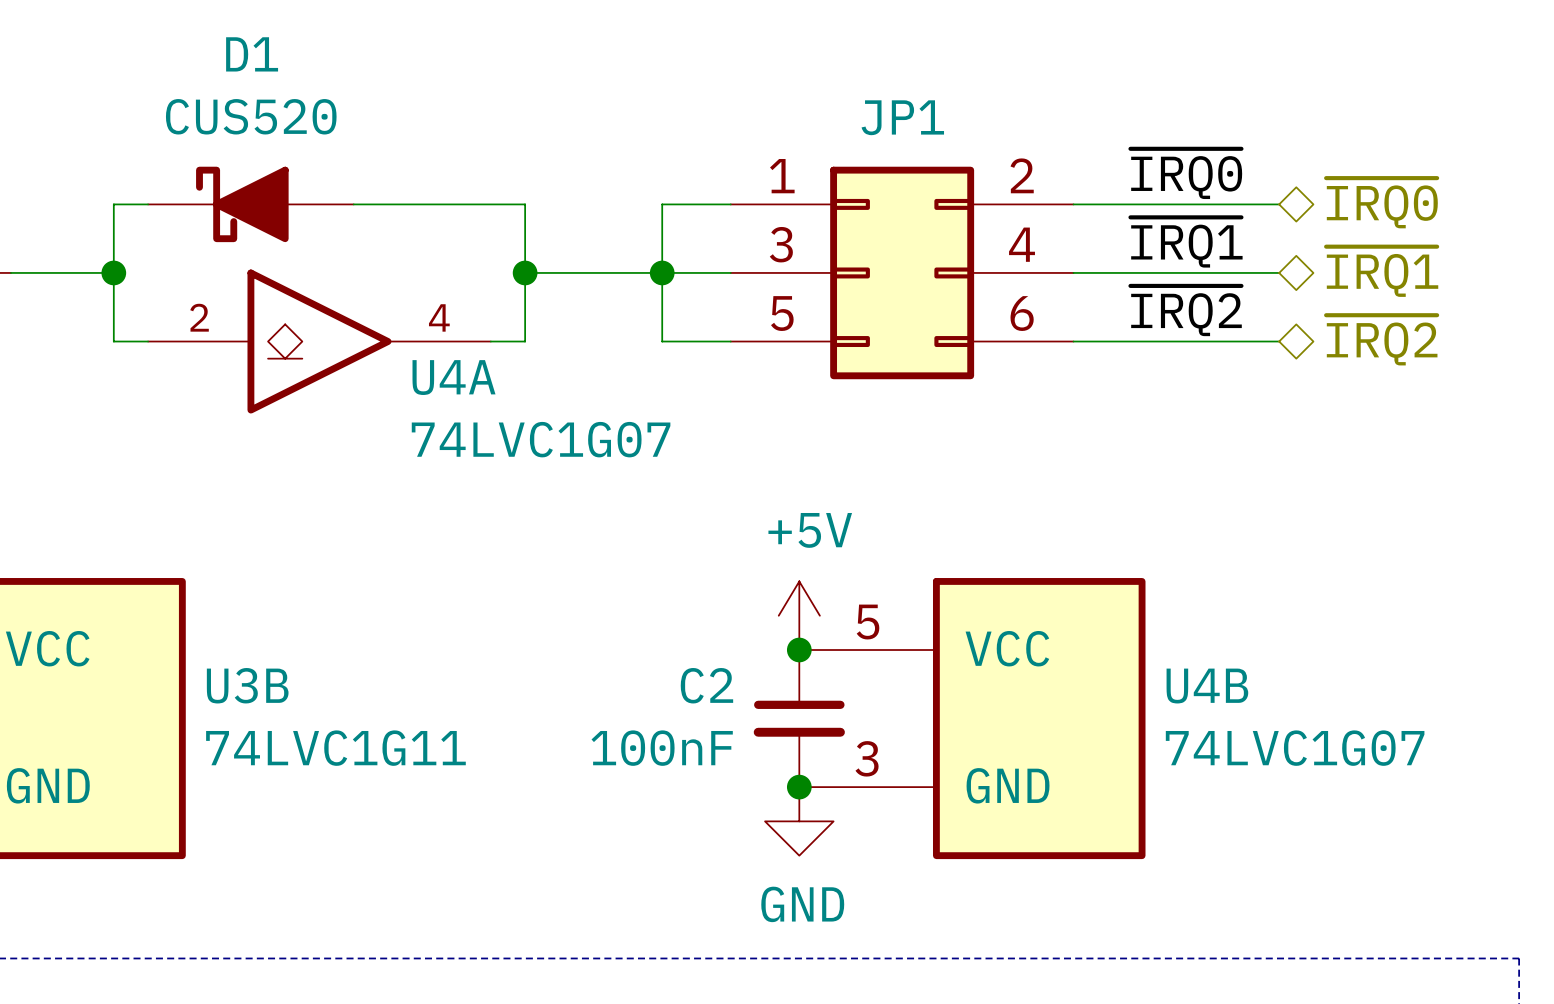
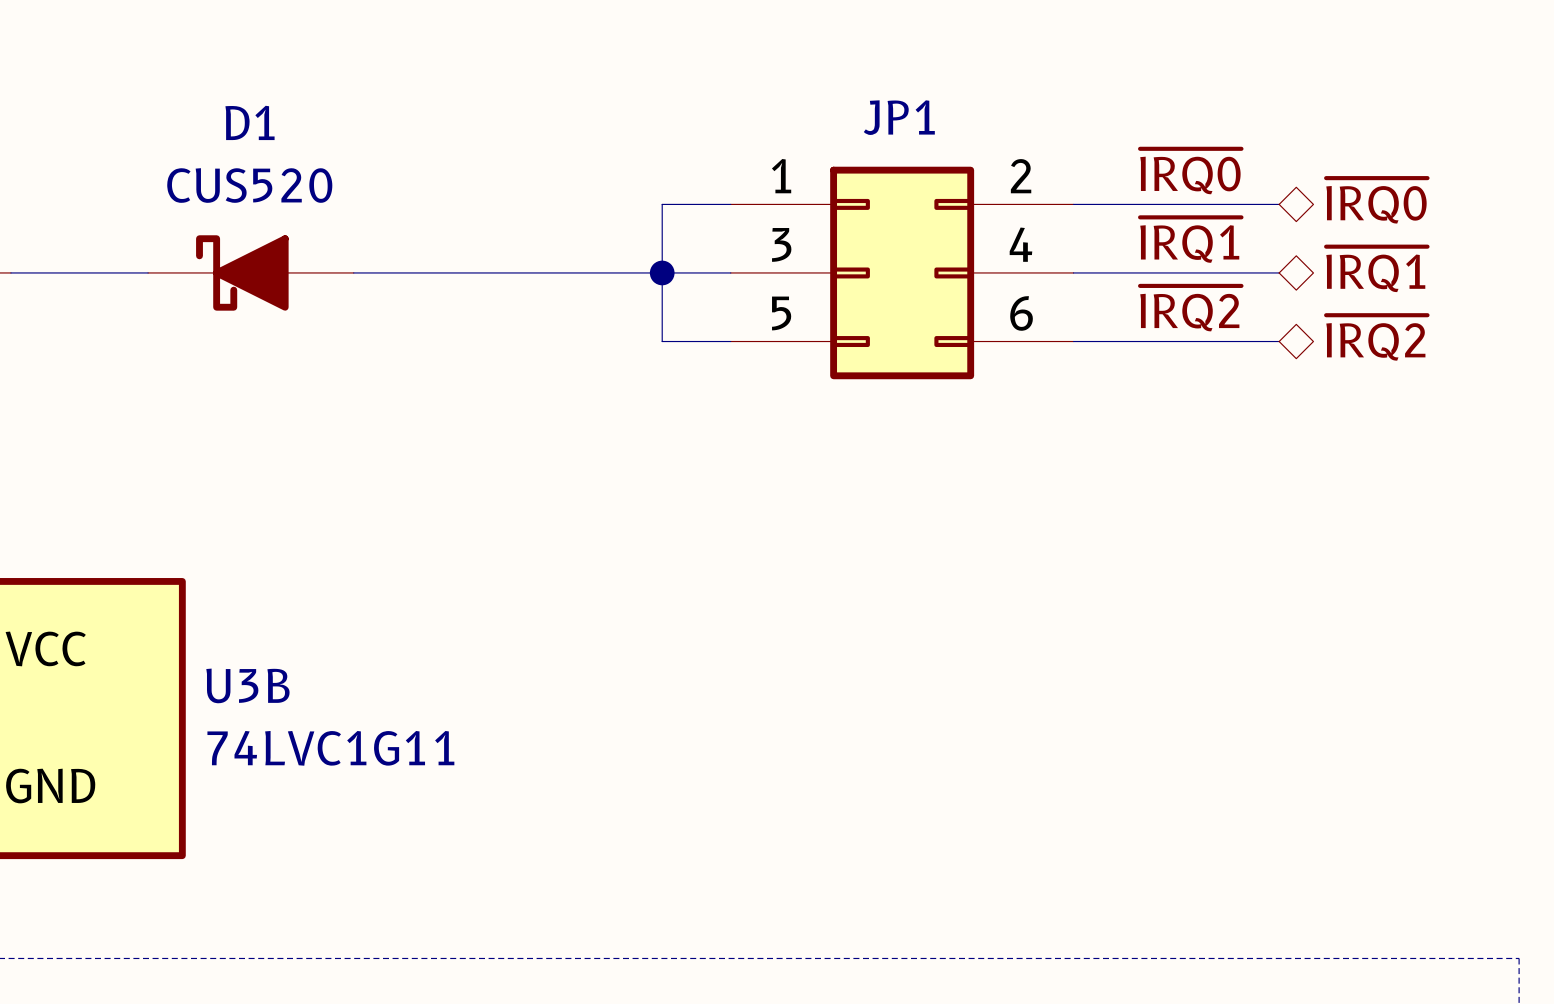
wire: (148, 204) (113, 204) (113, 341) (148, 341) -> none
D1 position: (250, 204) -> (250, 272)
wire: (353, 204) (525, 204) (525, 341) (490, 341) -> none
wire: none -> (113, 272) (148, 272)
junction: (113, 272) -> none
wire: none -> (353, 272) (525, 272)
junction: (525, 272) -> none
U4A: 74LVC1G07 (319, 341) -> none
power symbol: +5V (799, 615) -> none
junction: (799, 650) -> none
C2: 100nF (799, 718) -> none
U4B: 74LVC1G07 (972, 718) -> none
junction: (799, 787) -> none
power symbol: GND (799, 821) -> none

